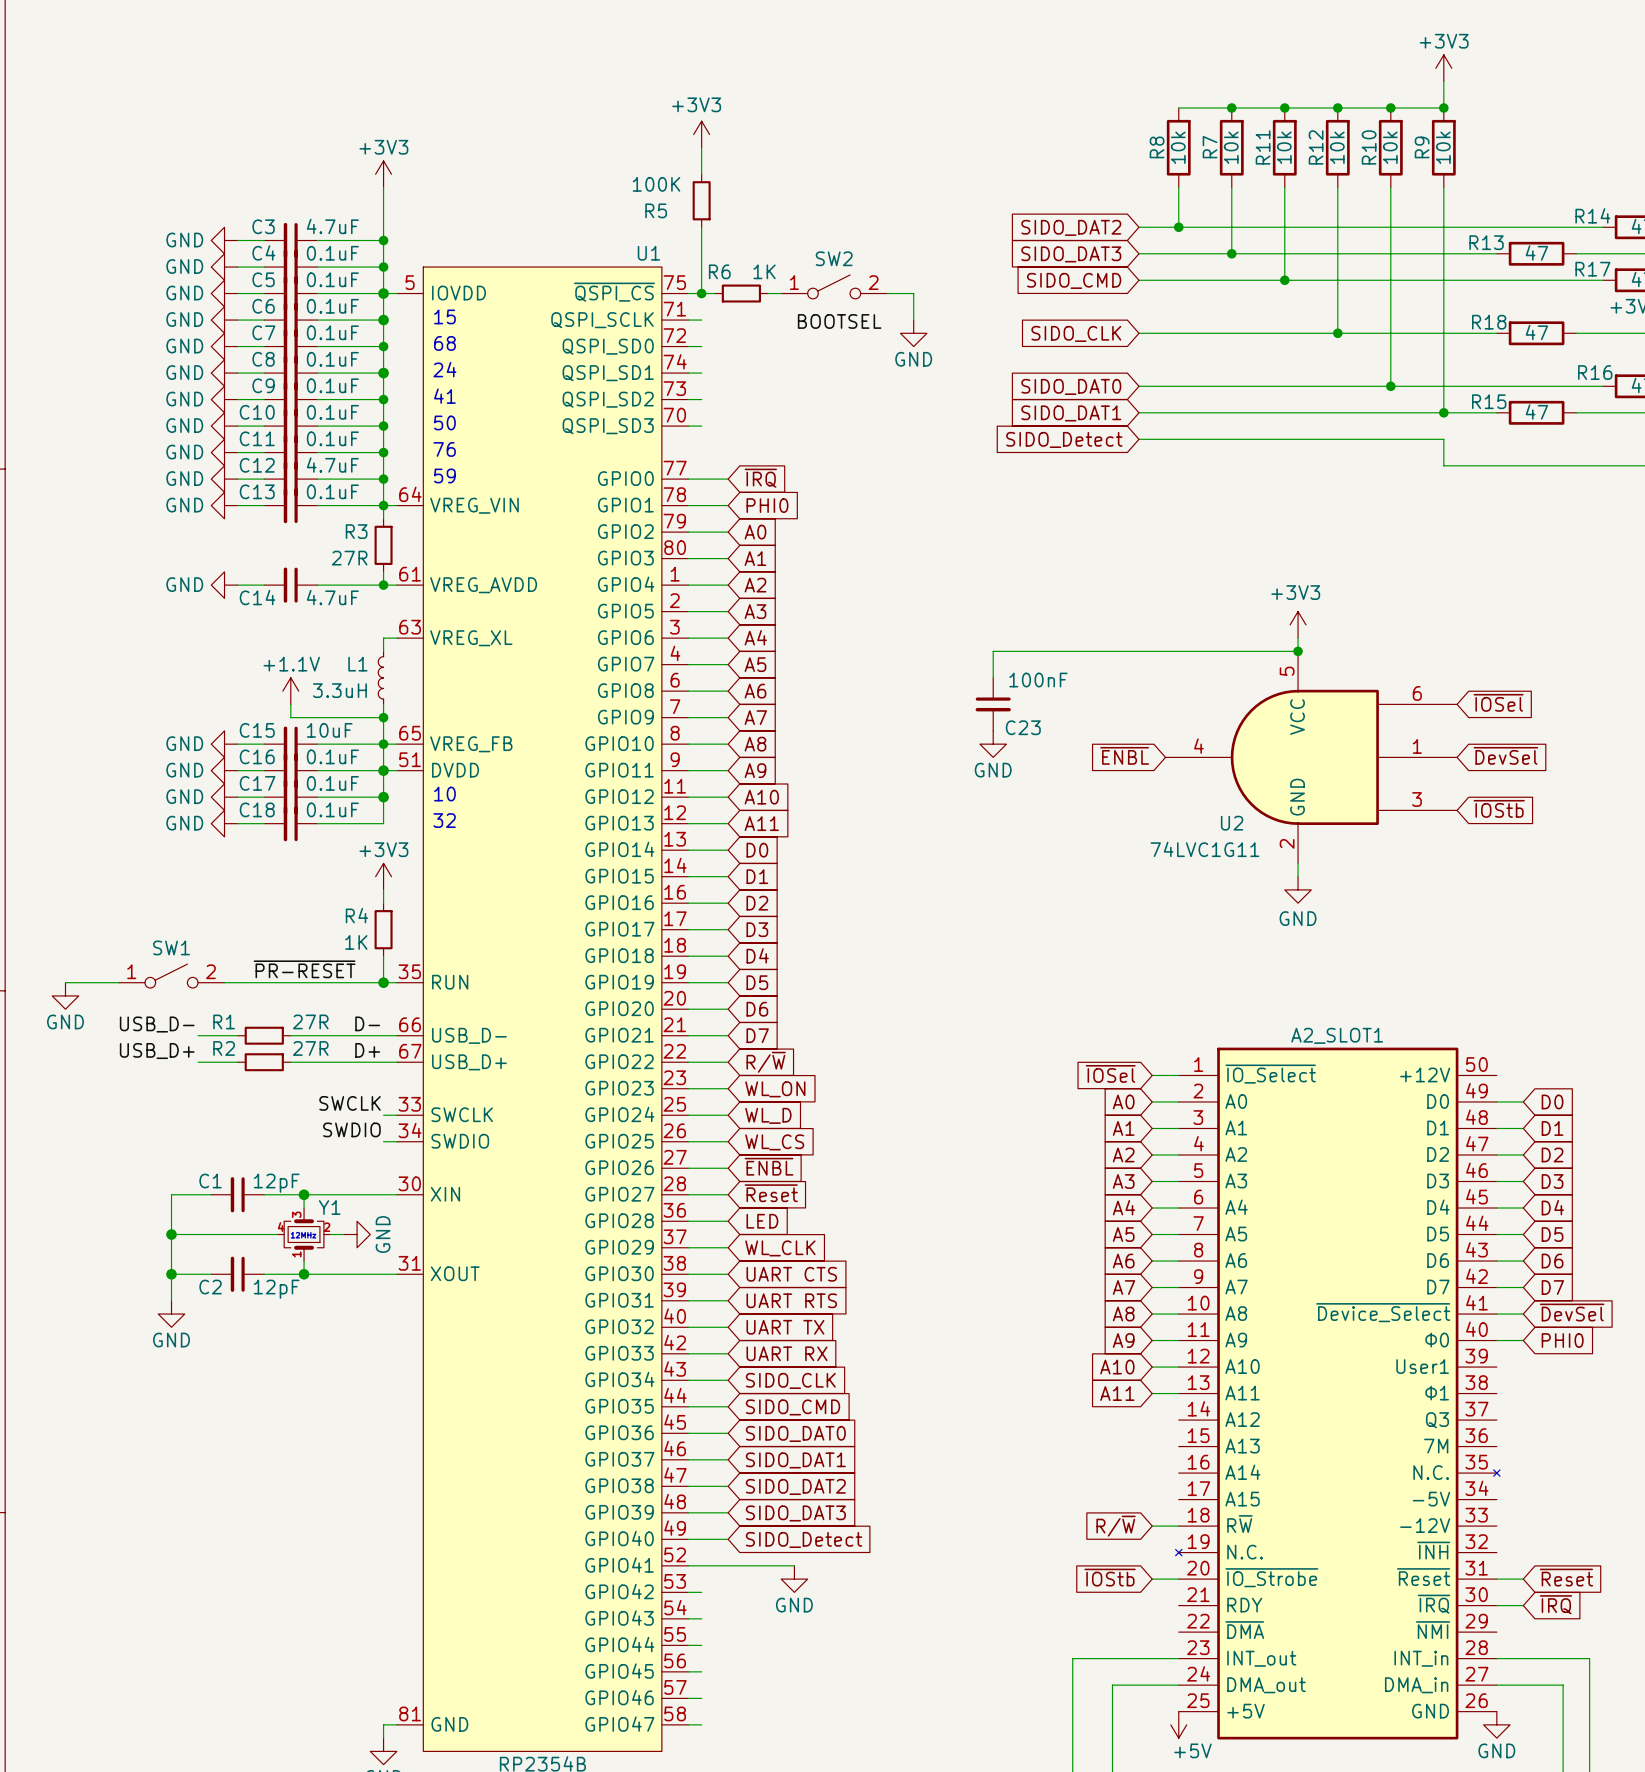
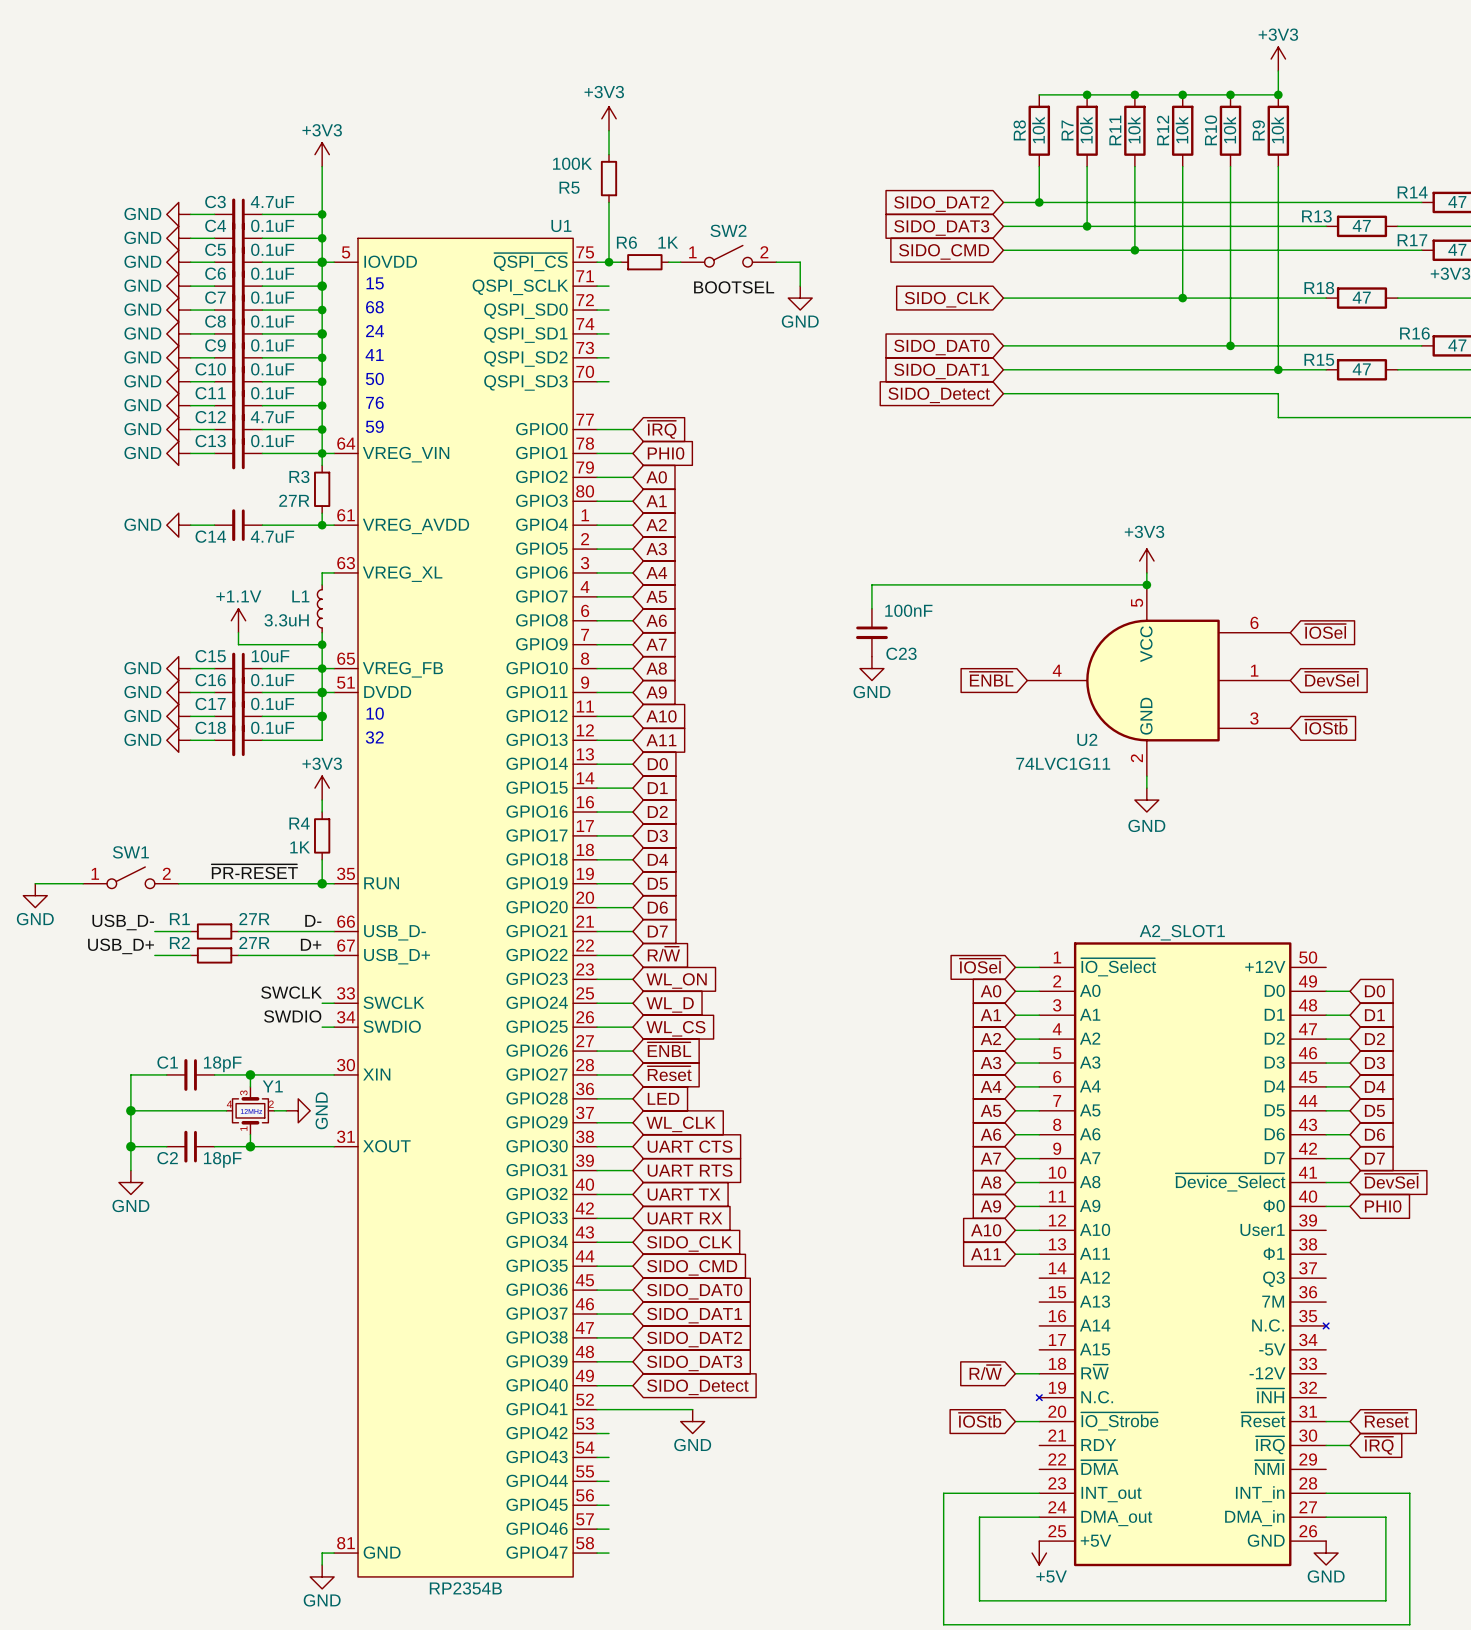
C1 value: 12pF (276, 1183) -> 18pF (222, 1064)
C2 value: 12pF (276, 1289) -> 18pF (222, 1159)

